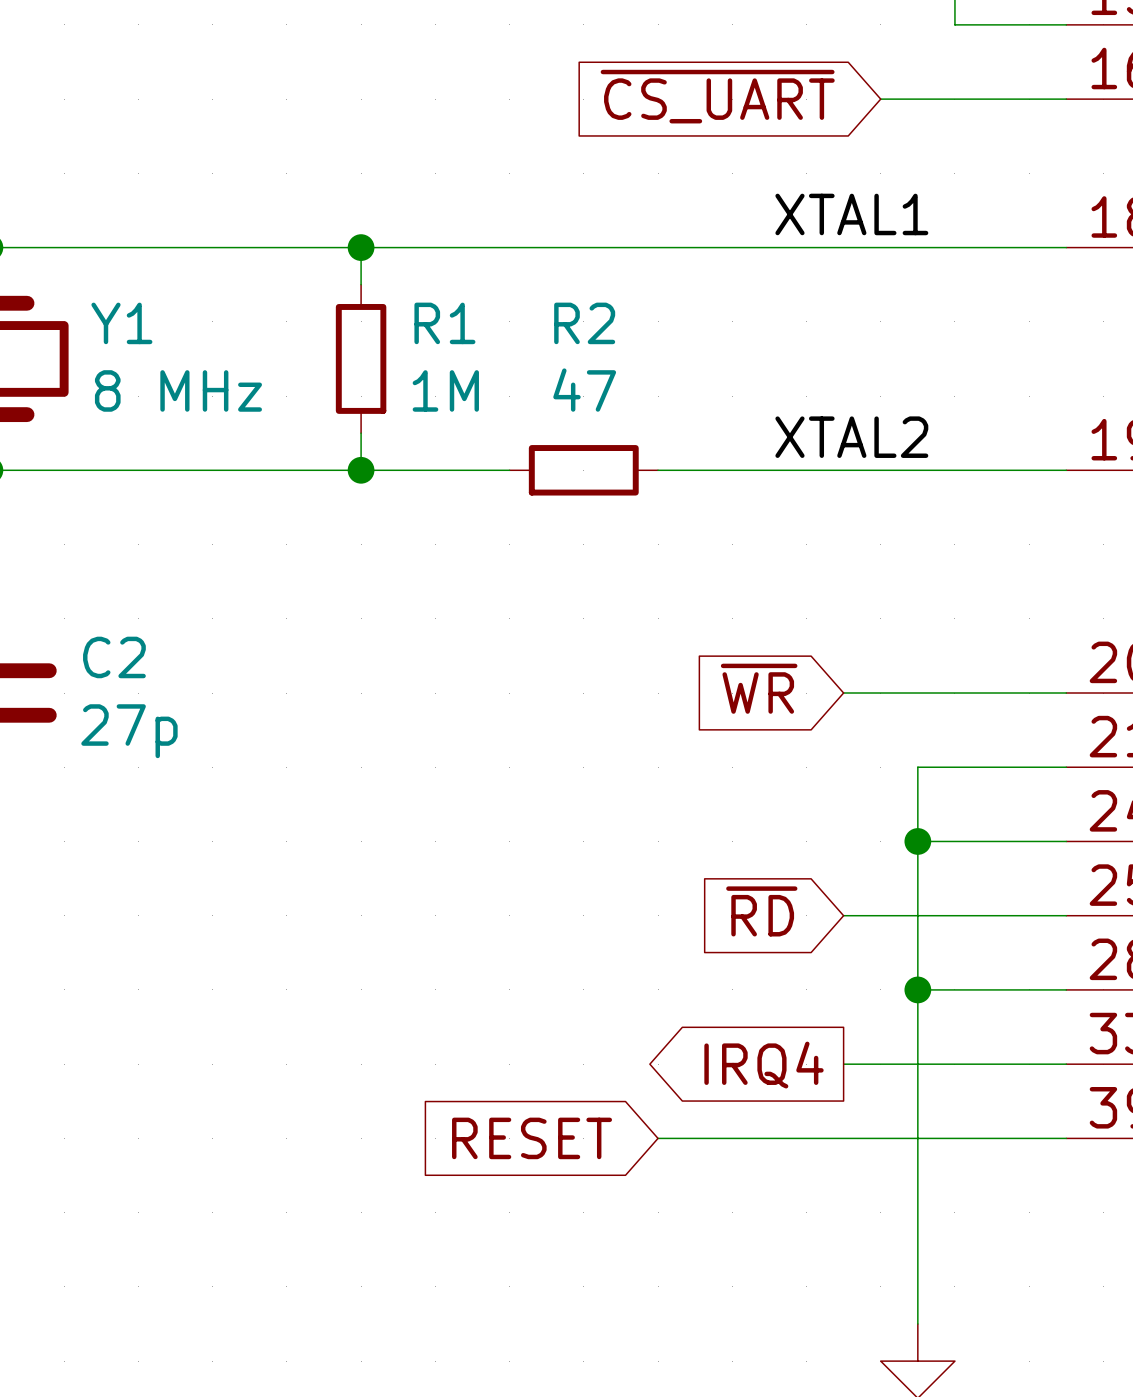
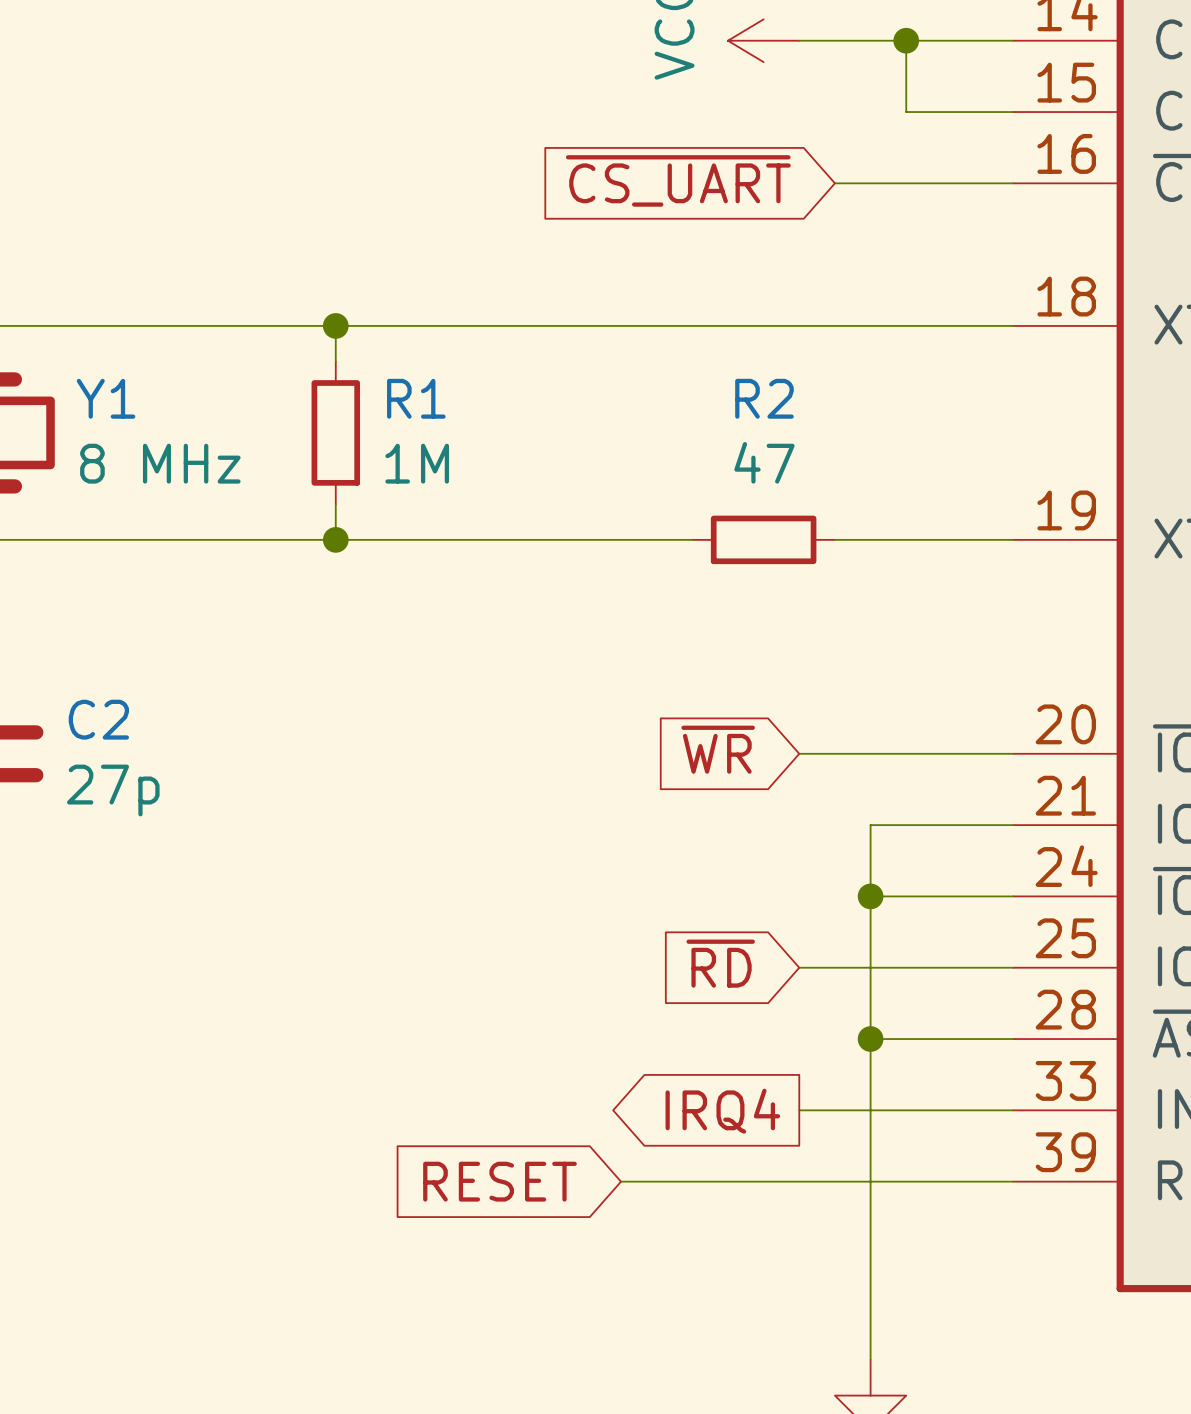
label: XTAL1 (851, 214) -> none
label: XTAL2 (851, 437) -> none
R2 position: (583, 470) -> (763, 539)
wire: (732, 470) (880, 470) -> (478, 539) (621, 539)

